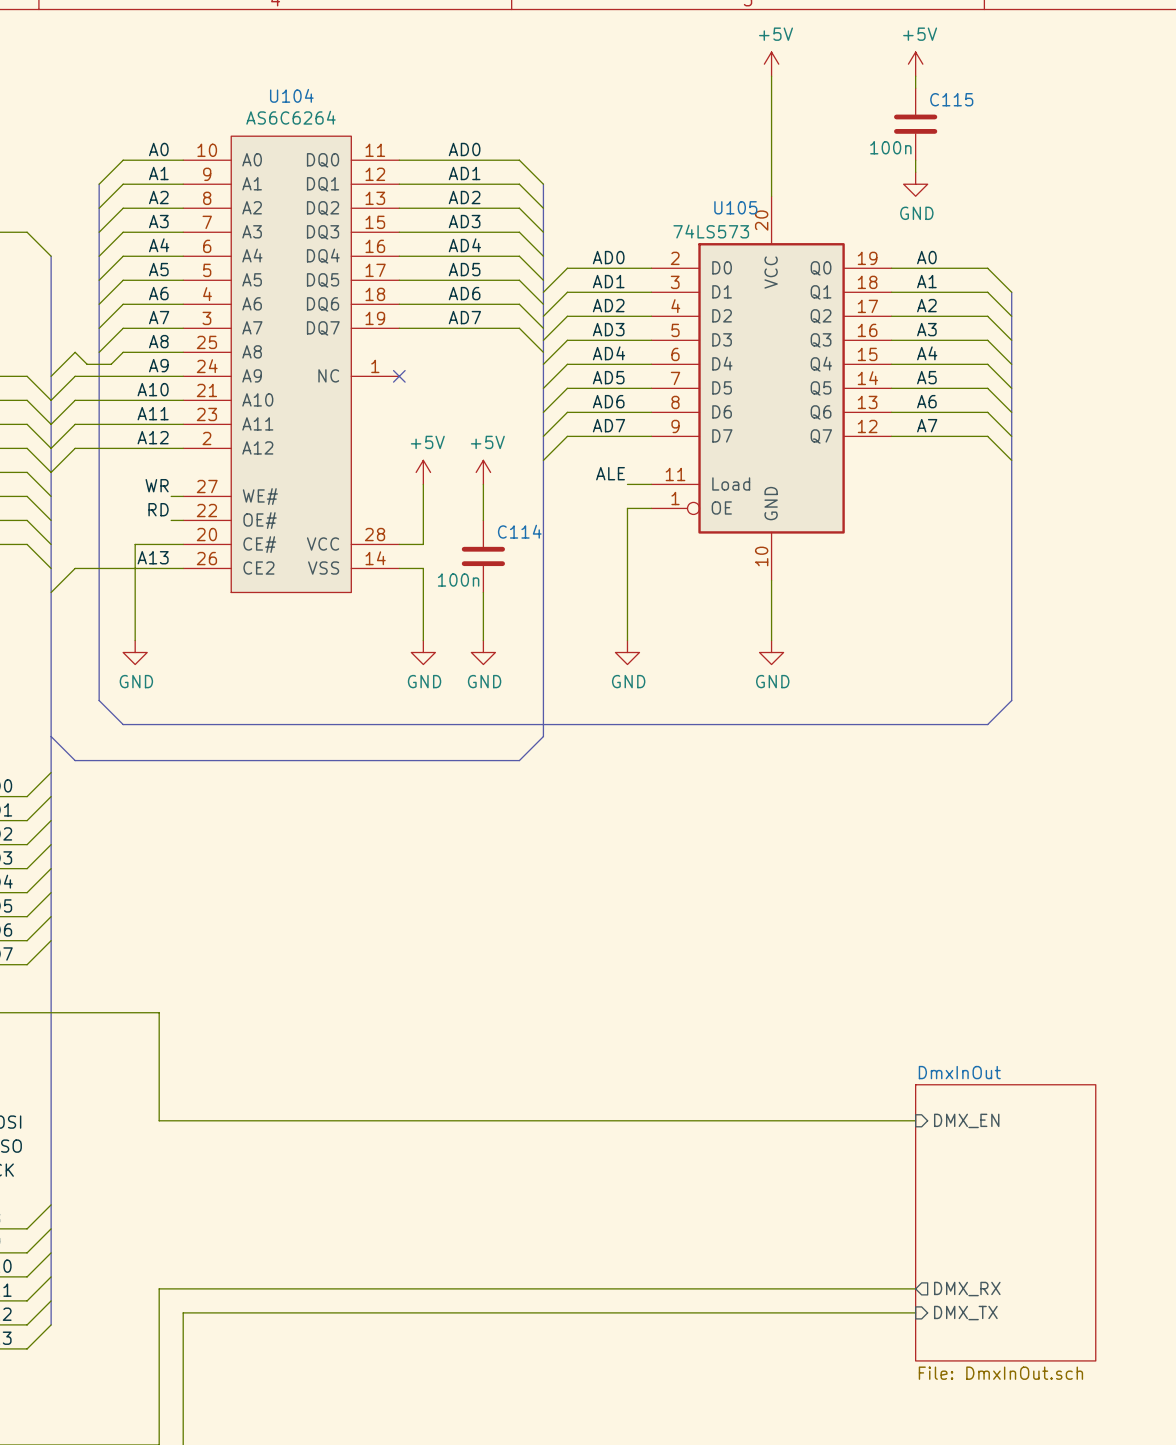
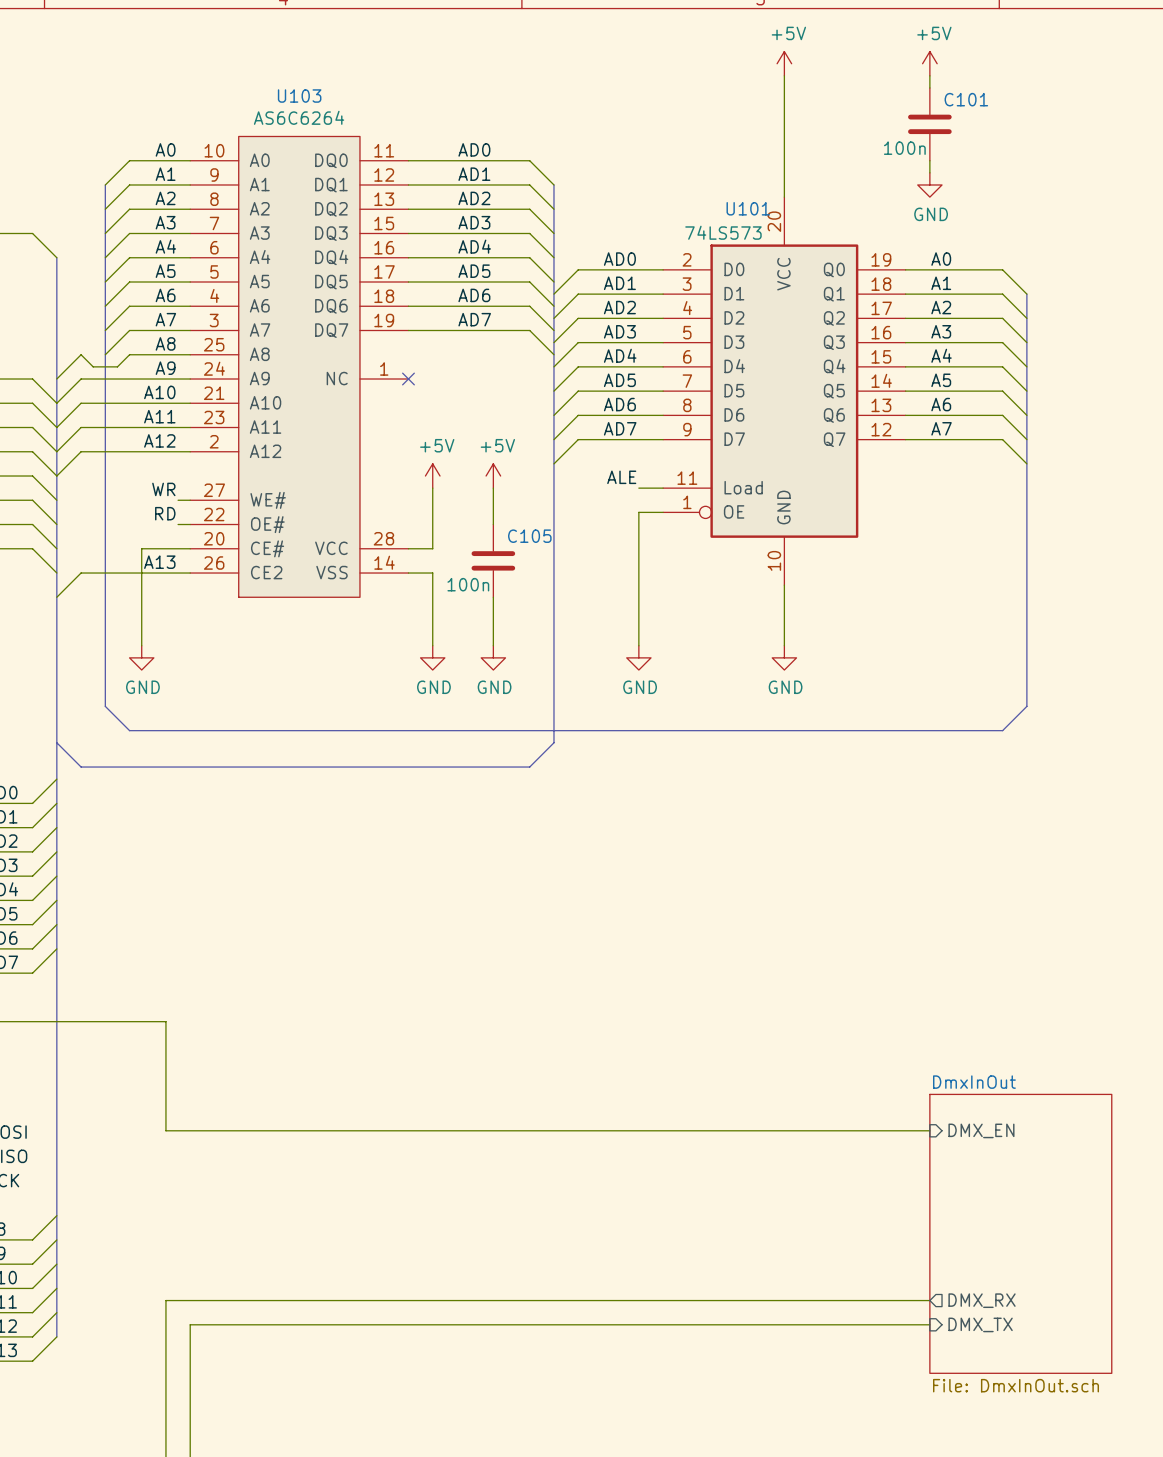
U104 name: U104 (291, 95) -> U103 (299, 96)
C115 name: C115 (951, 99) -> C101 (966, 99)
U105 name: U105 (735, 207) -> U101 (748, 208)
C114 name: C114 (519, 531) -> C105 (529, 536)

